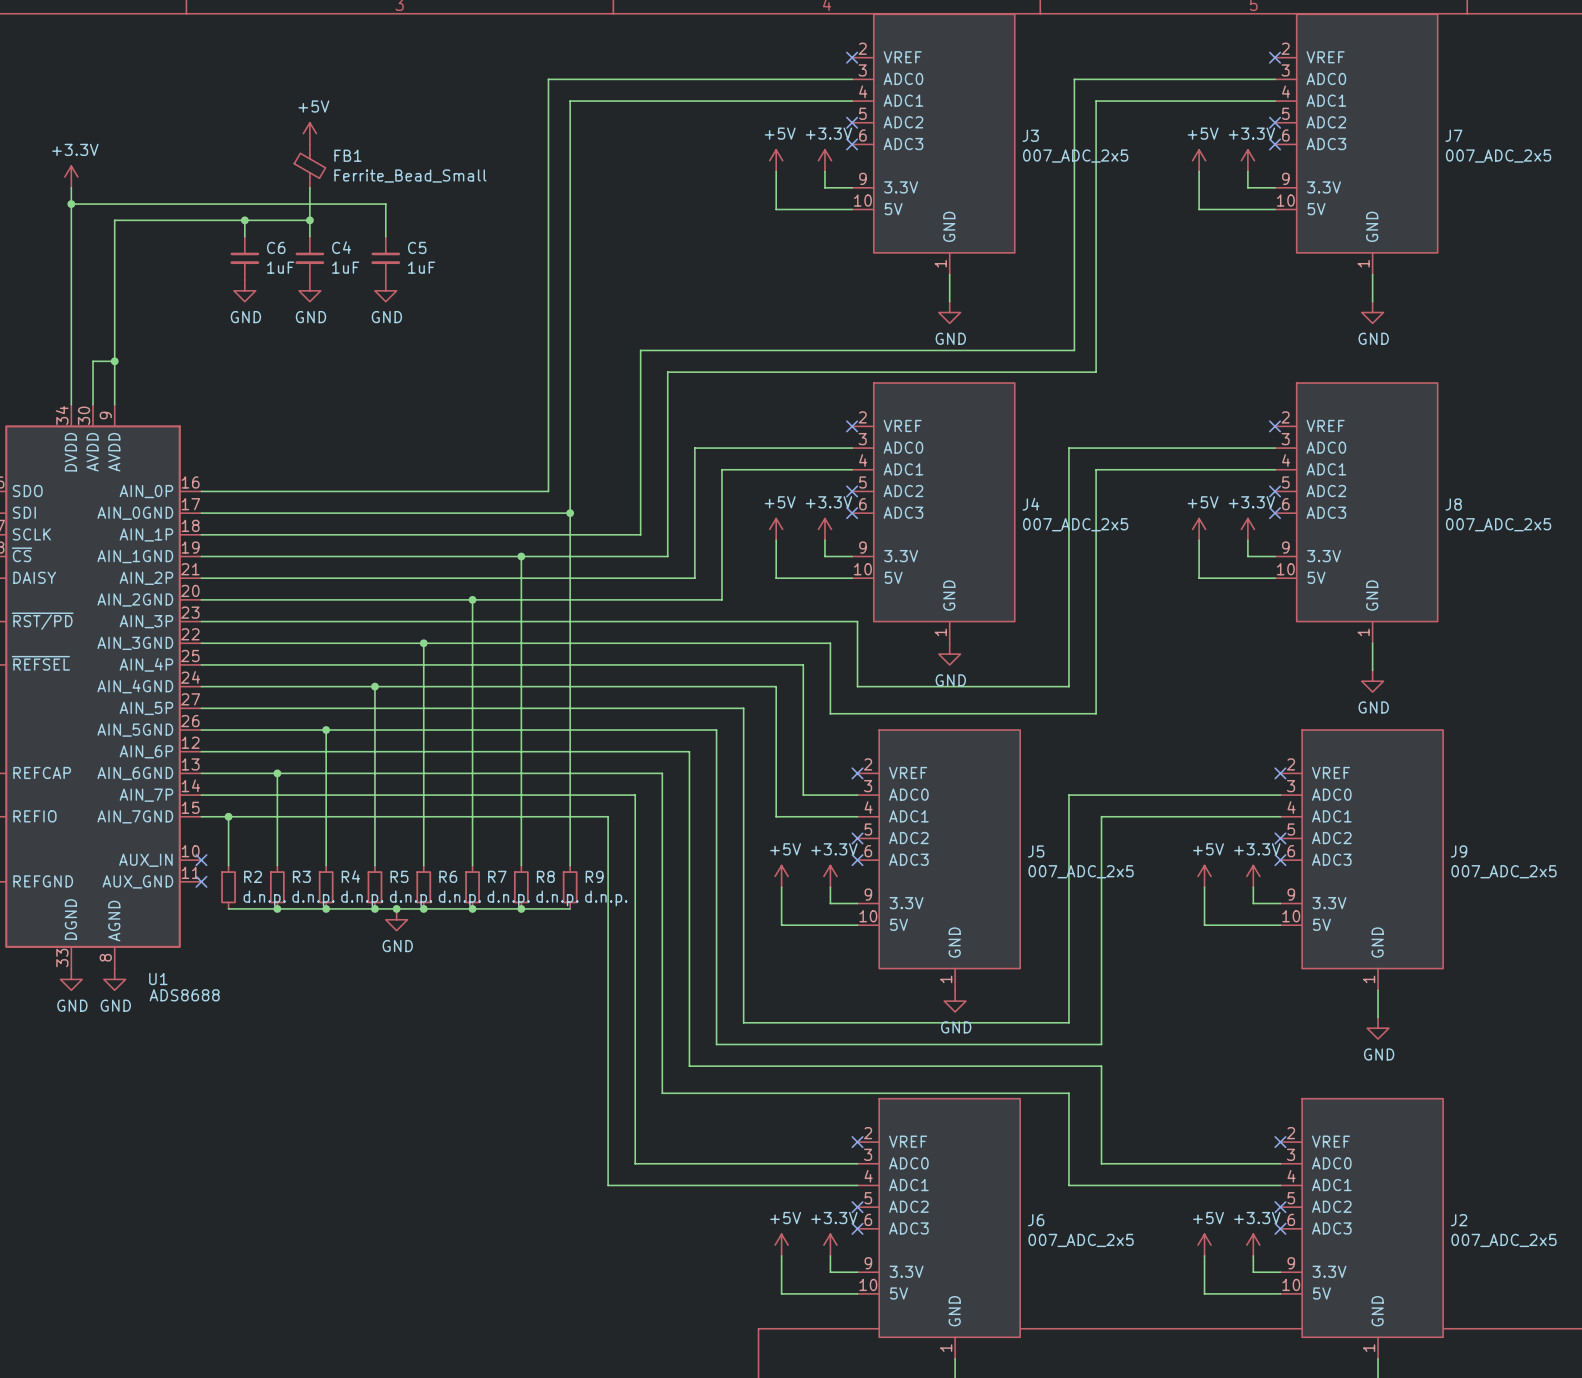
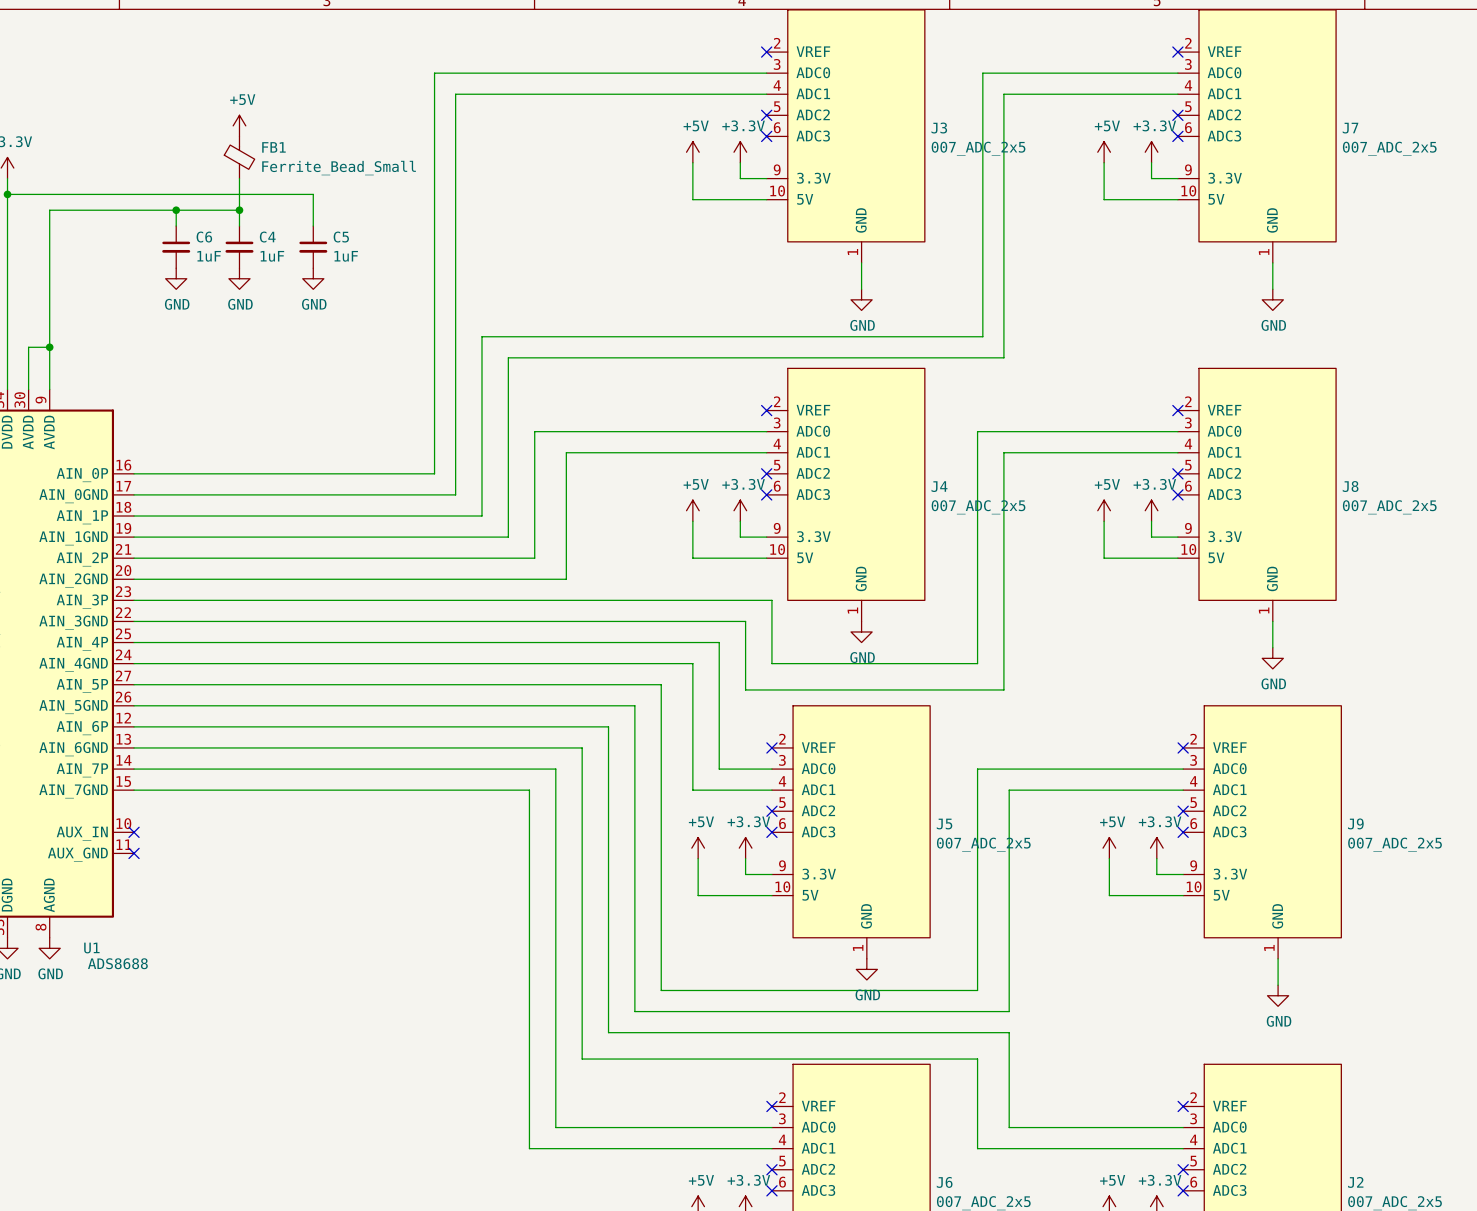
wire: (548, 79) (548, 491) (510, 491) -> (471, 73) (434, 73) (434, 473)
wire: (570, 101) (570, 865) -> (492, 94) (455, 94) (455, 494)
wire: (640, 350) (640, 534) (559, 534) -> (561, 336) (481, 336) (481, 516)
wire: (667, 372) (667, 556) (586, 556) -> (587, 357) (508, 357) (508, 537)
wire: (694, 448) (694, 578) (613, 578) -> (613, 431) (534, 431) (534, 558)
wire: (721, 469) (721, 599) (646, 599) -> (640, 452) (566, 452) (566, 579)
wire: (532, 513) (570, 513) -> none
junction: (570, 513) -> none
wire: (521, 556) (521, 865) -> none
junction: (521, 556) -> none
wire: (472, 599) (472, 865) -> none
junction: (472, 599) -> none
wire: (423, 643) (423, 865) -> none
junction: (423, 643) -> none
wire: (374, 686) (374, 865) -> none
junction: (374, 686) -> none
wire: (326, 730) (326, 865) -> none
junction: (326, 730) -> none
wire: (277, 773) (277, 865) -> none
junction: (277, 773) -> none
wire: (228, 816) (228, 865) -> none
junction: (228, 816) -> none
R2: d.n.p. (228, 887) -> none
R3: d.n.p. (277, 887) -> none
R4: d.n.p. (326, 887) -> none
R5: d.n.p. (374, 887) -> none
R6: d.n.p. (423, 887) -> none
R7: d.n.p. (472, 887) -> none
R8: d.n.p. (521, 887) -> none
R9: d.n.p. (570, 887) -> none
wire: (228, 908) (570, 908) -> none
junction: (277, 908) -> none
junction: (326, 908) -> none
junction: (374, 908) -> none
junction: (396, 908) -> none
junction: (423, 908) -> none
junction: (472, 908) -> none
junction: (521, 908) -> none
power symbol: GND (396, 919) -> none

